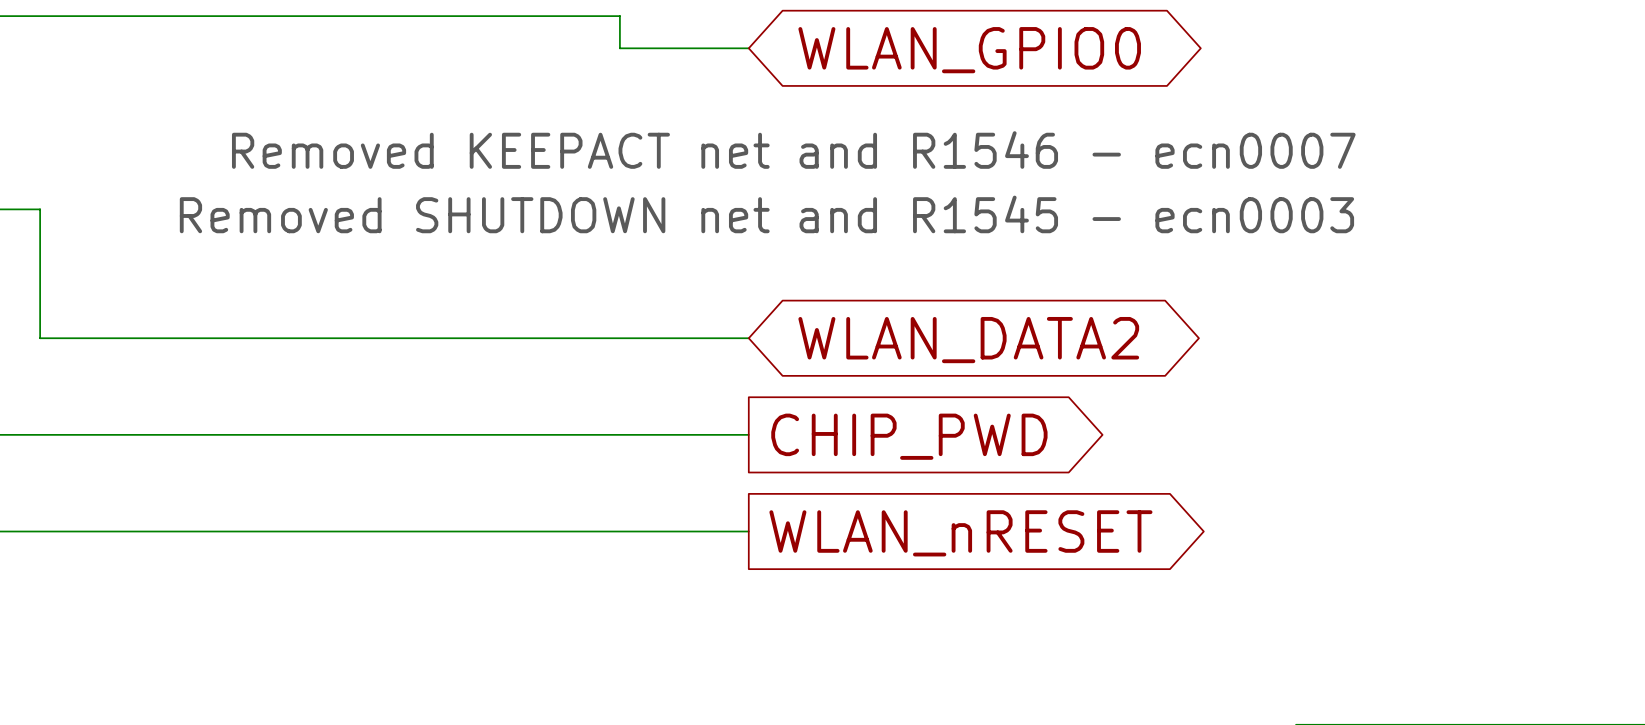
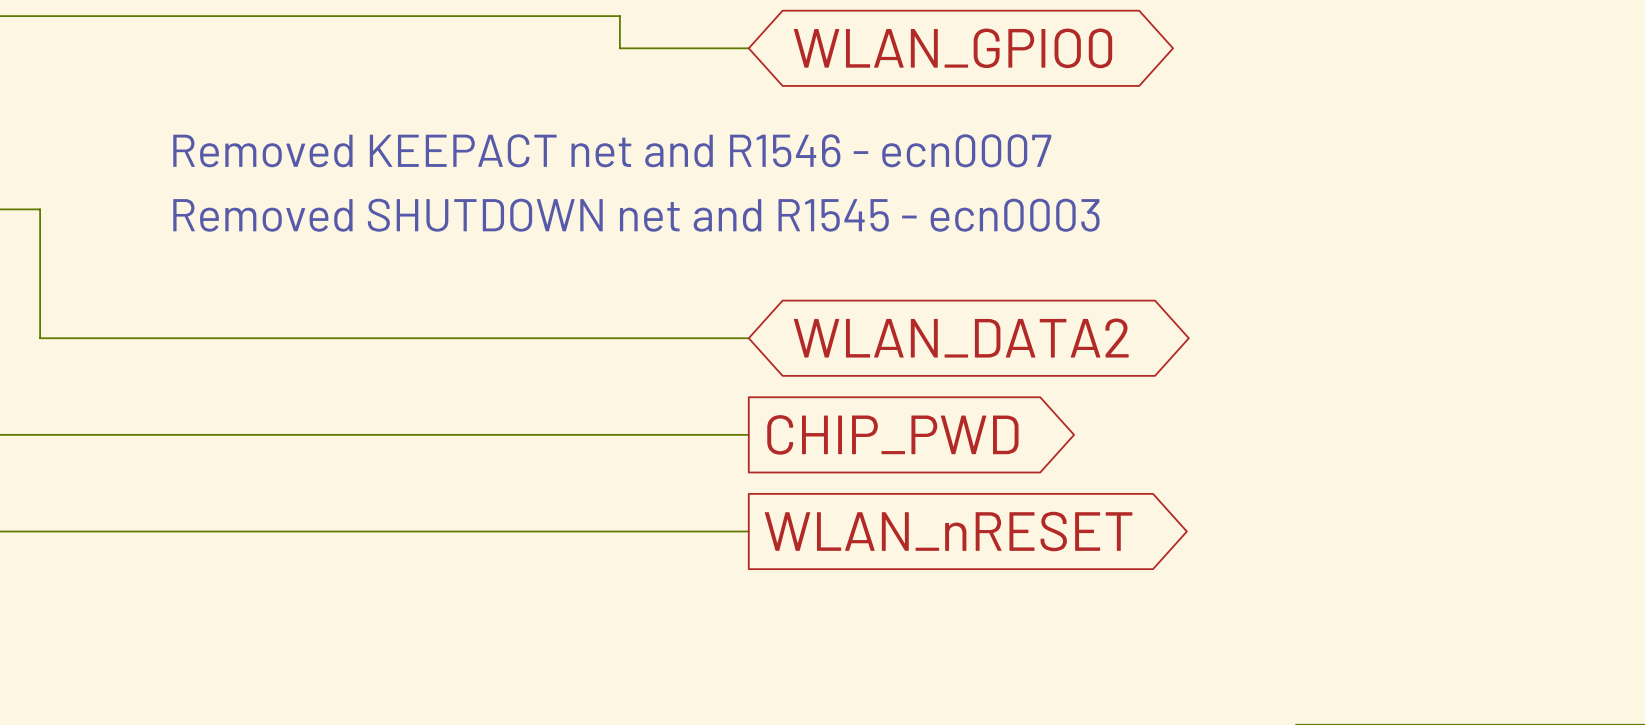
text: none -> Removed KEEPACT net and R1546 - ecn0007 (612, 150)
text: Removed KEEPACT net and R1546 - ecn0007 (793, 150) -> none
text: none -> Removed SHUTDOWN net and R1545 - ecn0003 (636, 215)
text: Removed SHUTDOWN net and R1545 - ecn0003 (766, 214) -> none

